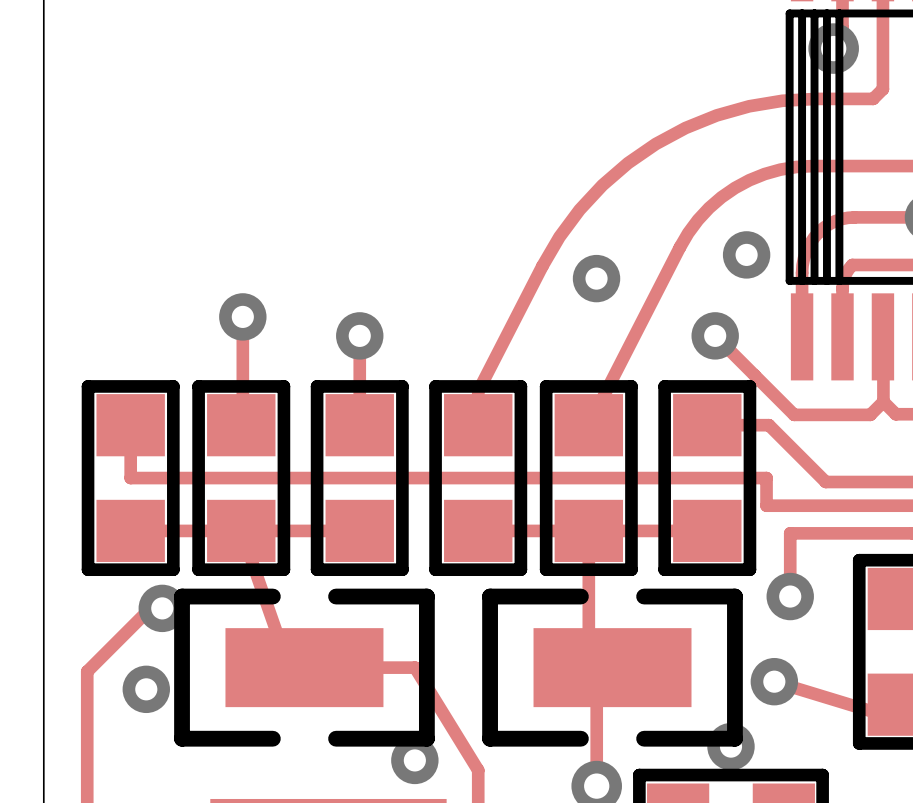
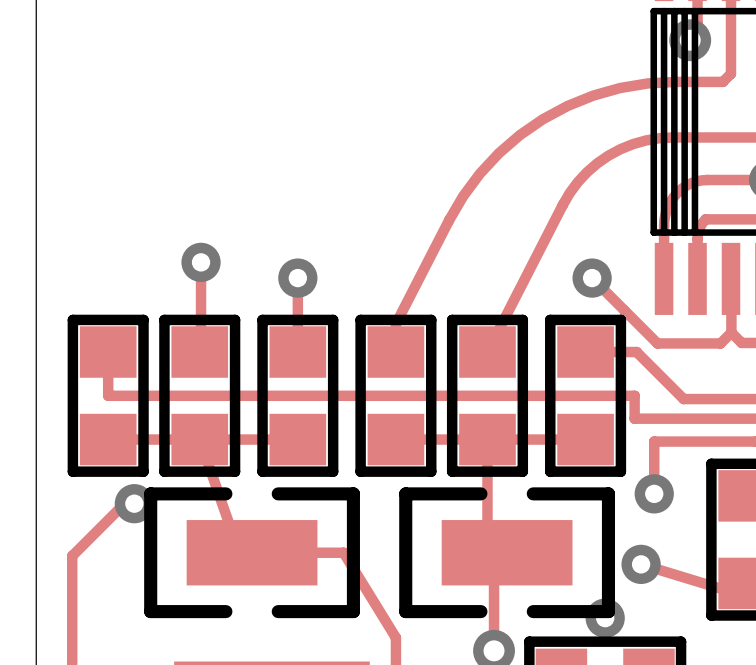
via: (746, 254) -> none
via: (596, 278) -> none
via: (146, 689) -> none
via: (414, 760) -> none

